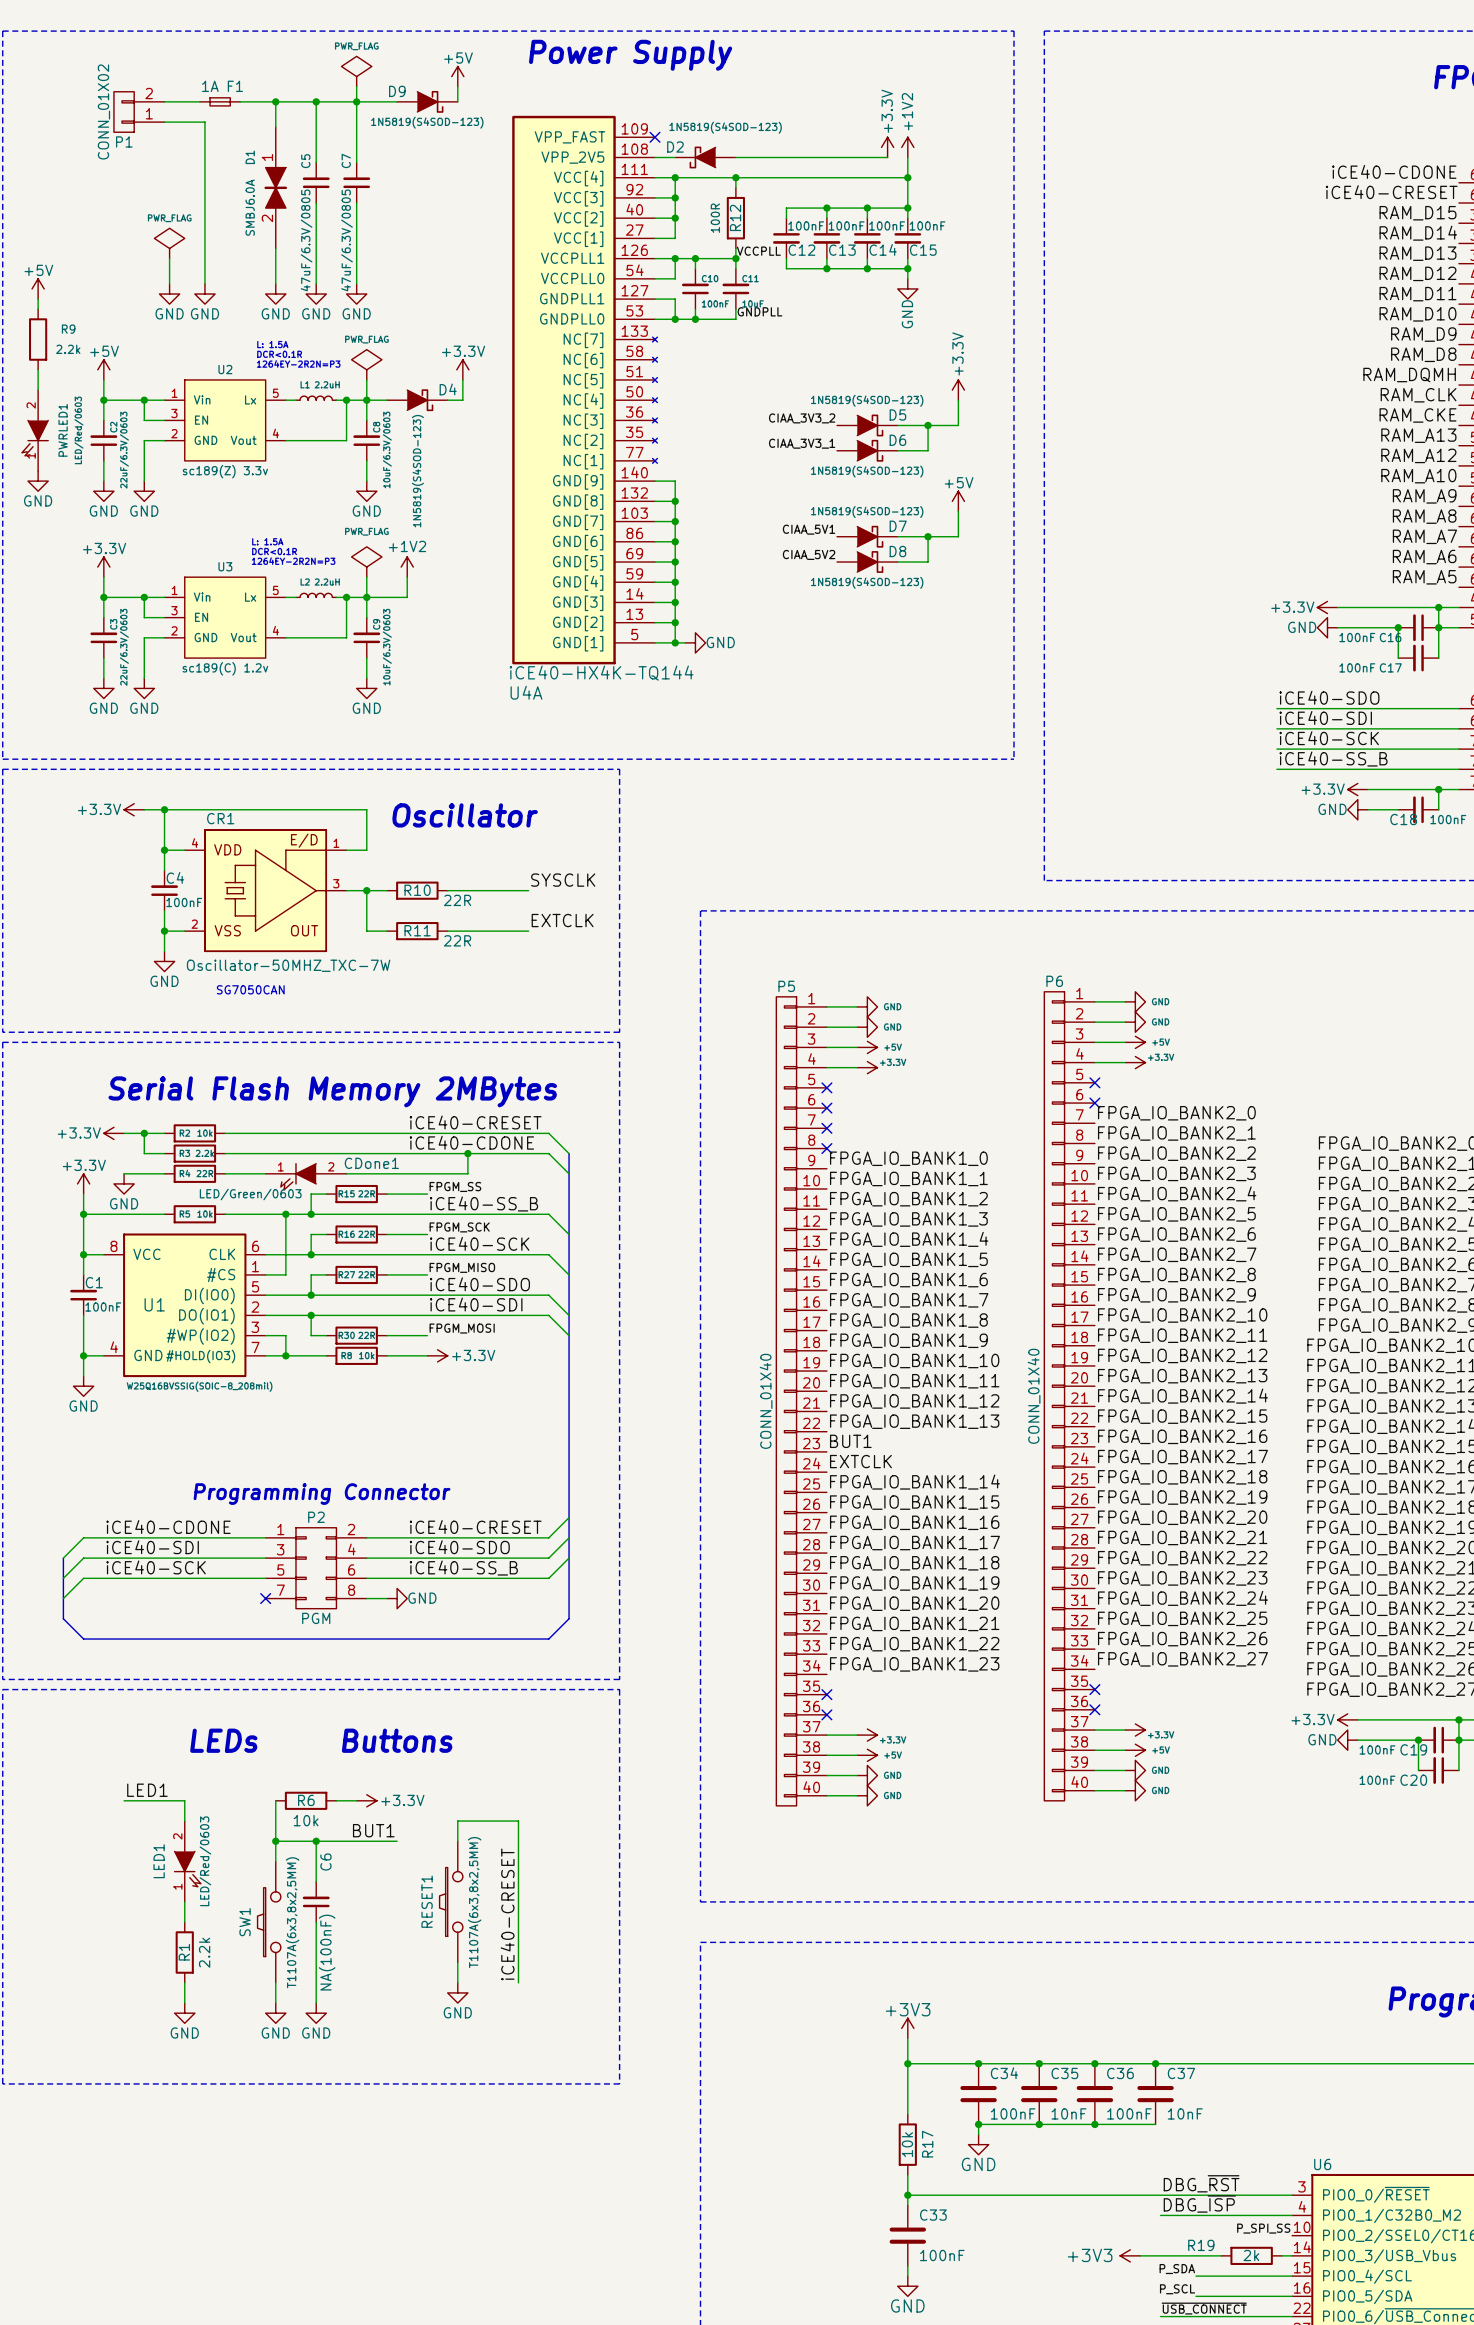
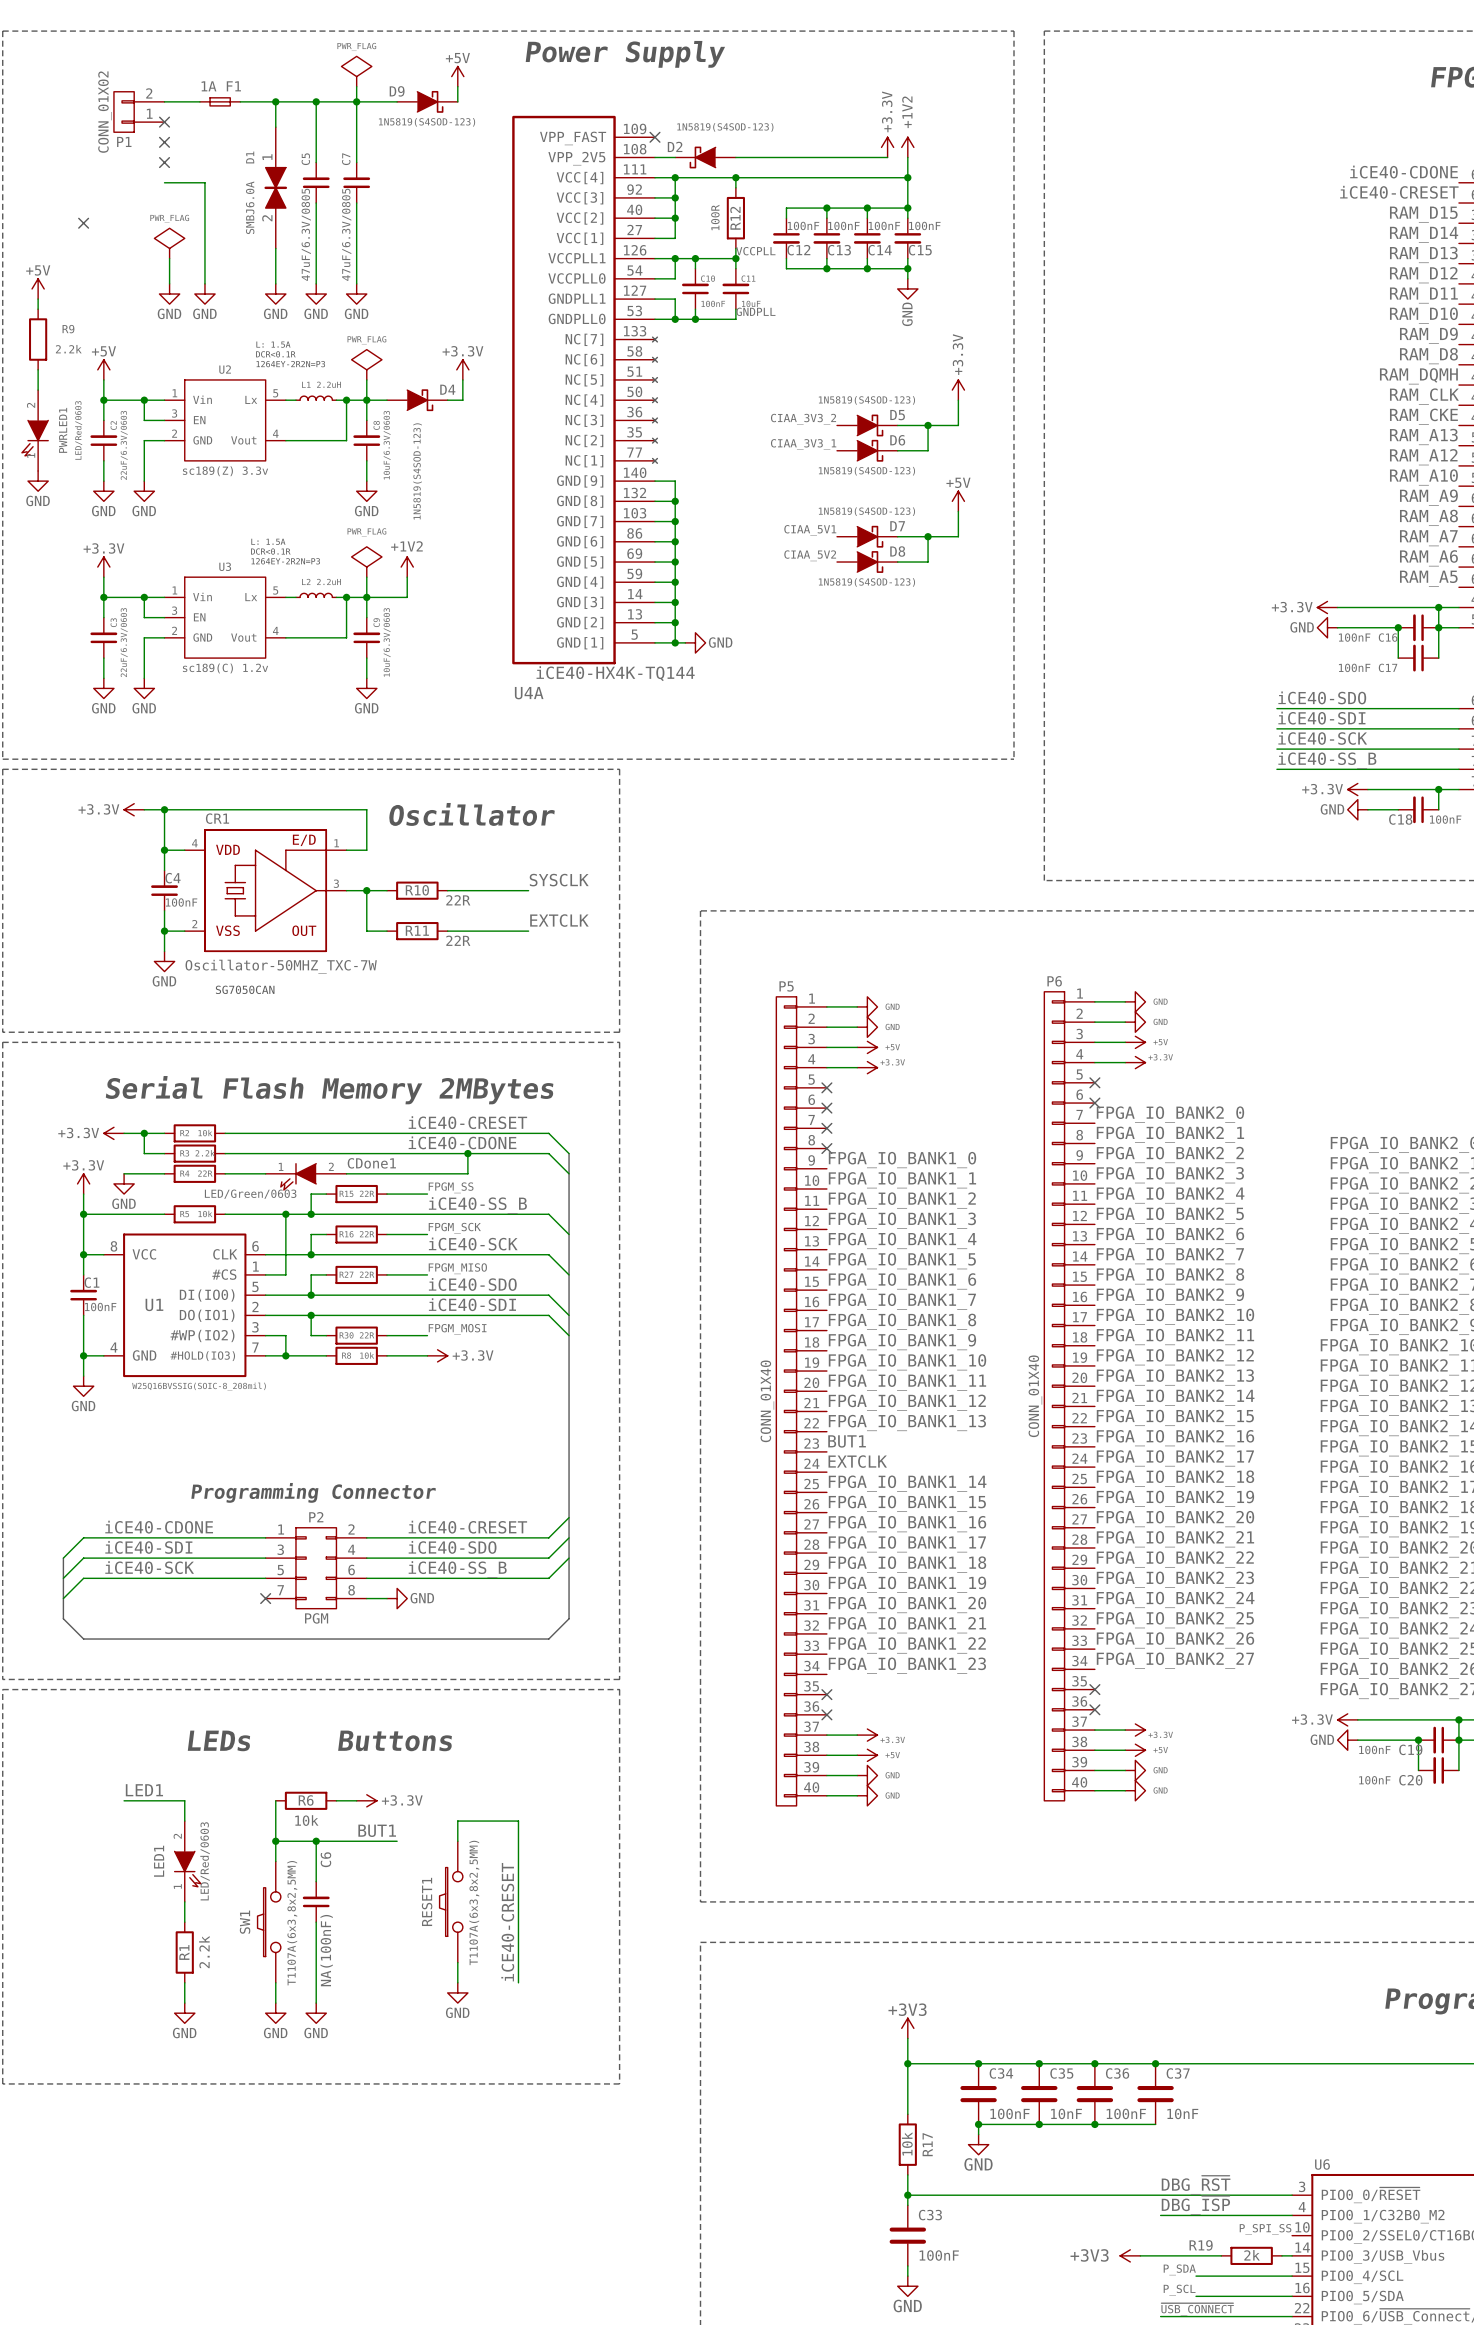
wire: (164, 122) (204, 122) (204, 182) -> (164, 182) (204, 182)
no-connect mark: none -> (164, 122)
no-connect mark: none -> (164, 142)
no-connect mark: none -> (164, 162)
no-connect mark: none -> (83, 223)

